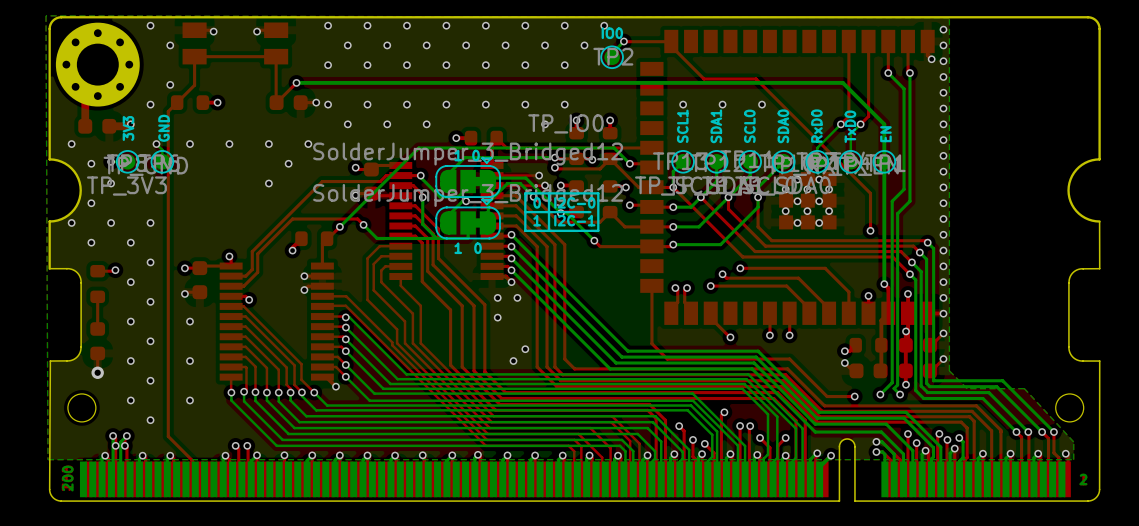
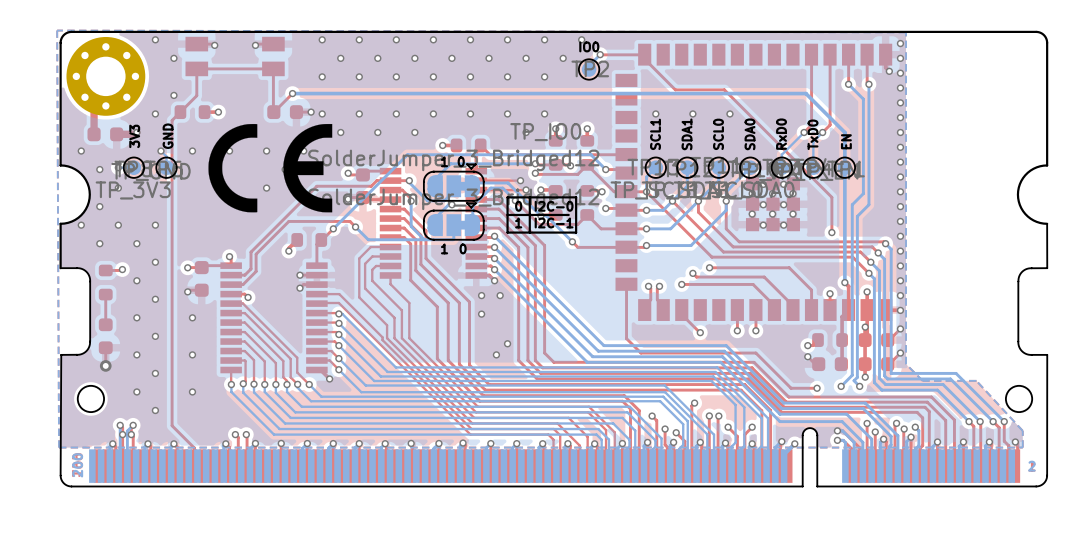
drawing: none -> [208, 123, 333, 213]

